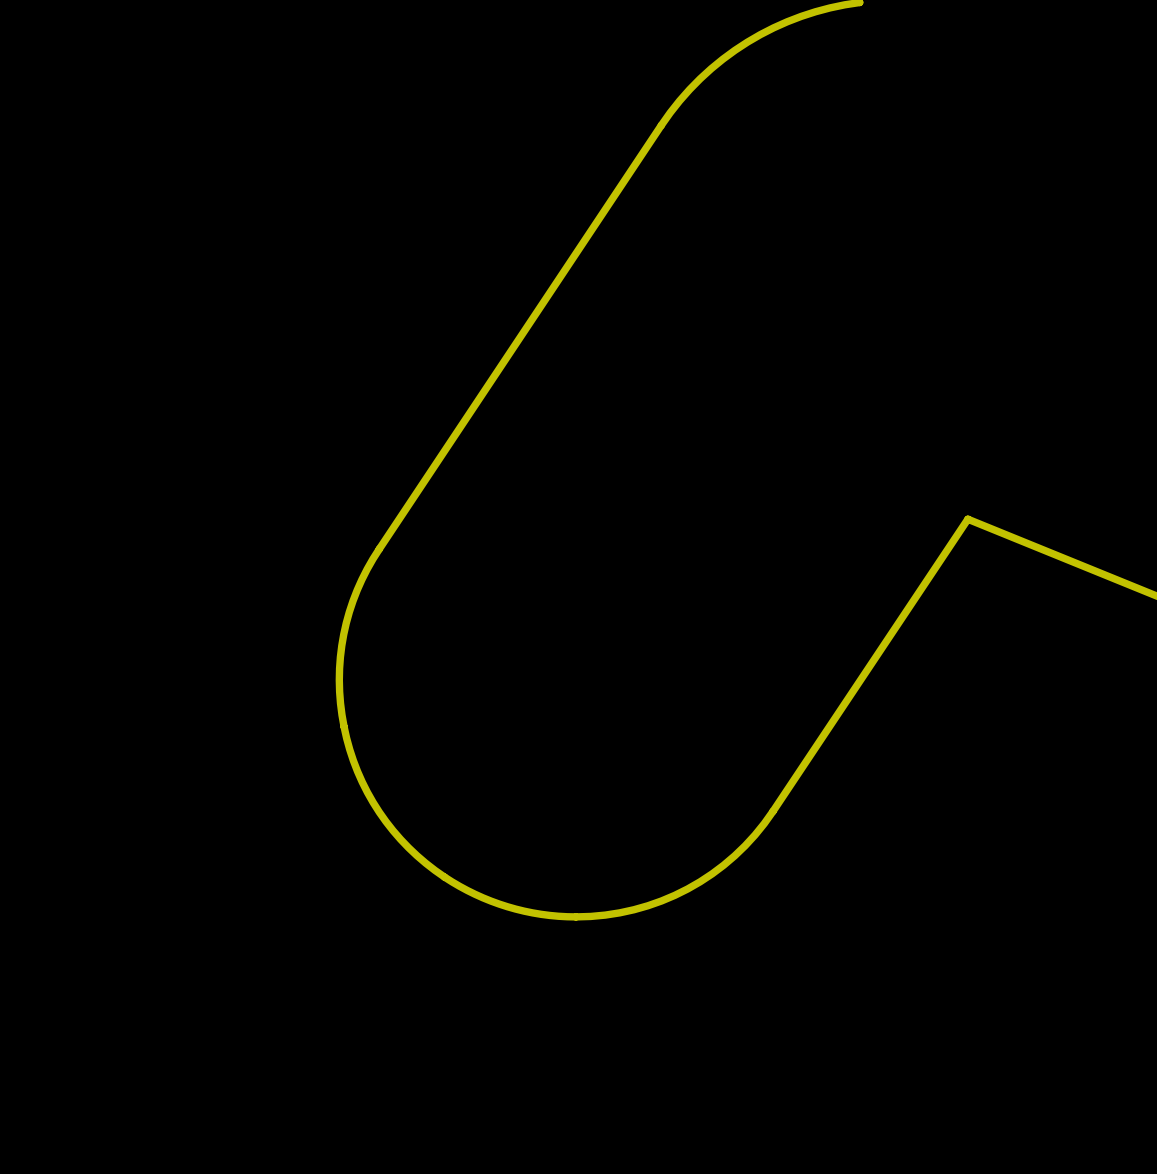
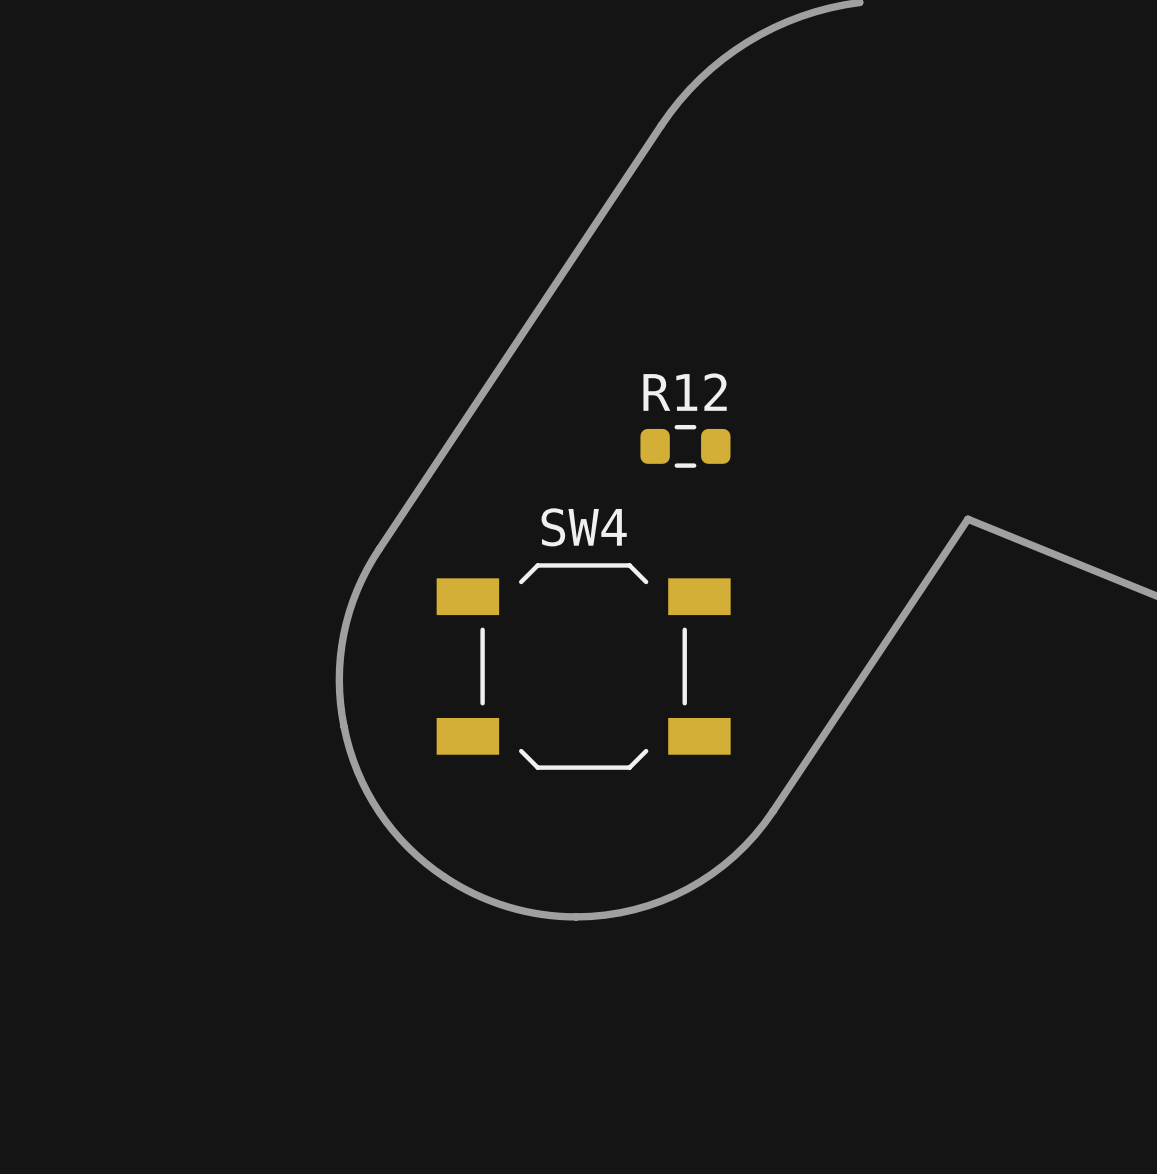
R12: none -> (685, 446)
SW4: none -> (583, 666)

